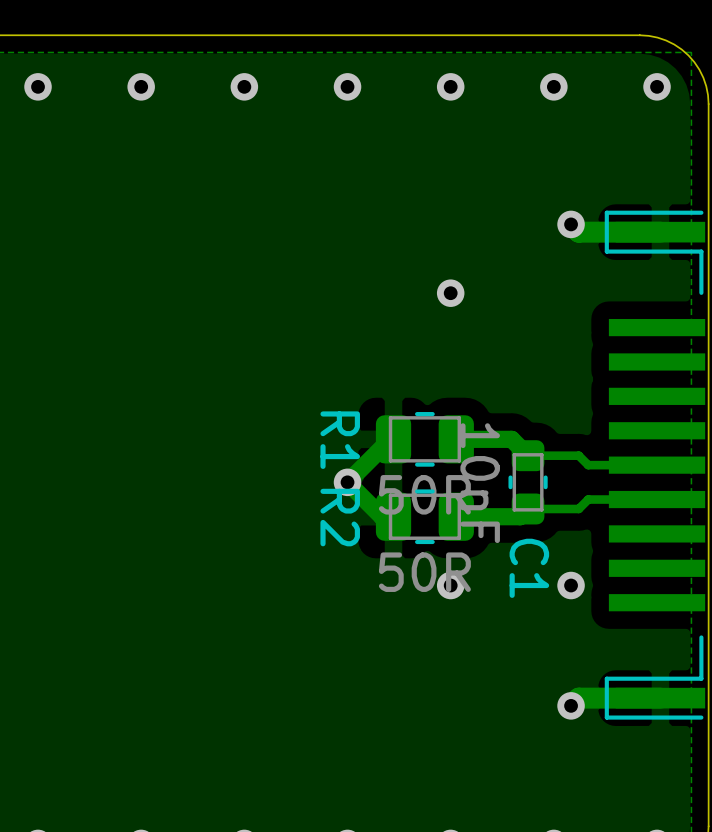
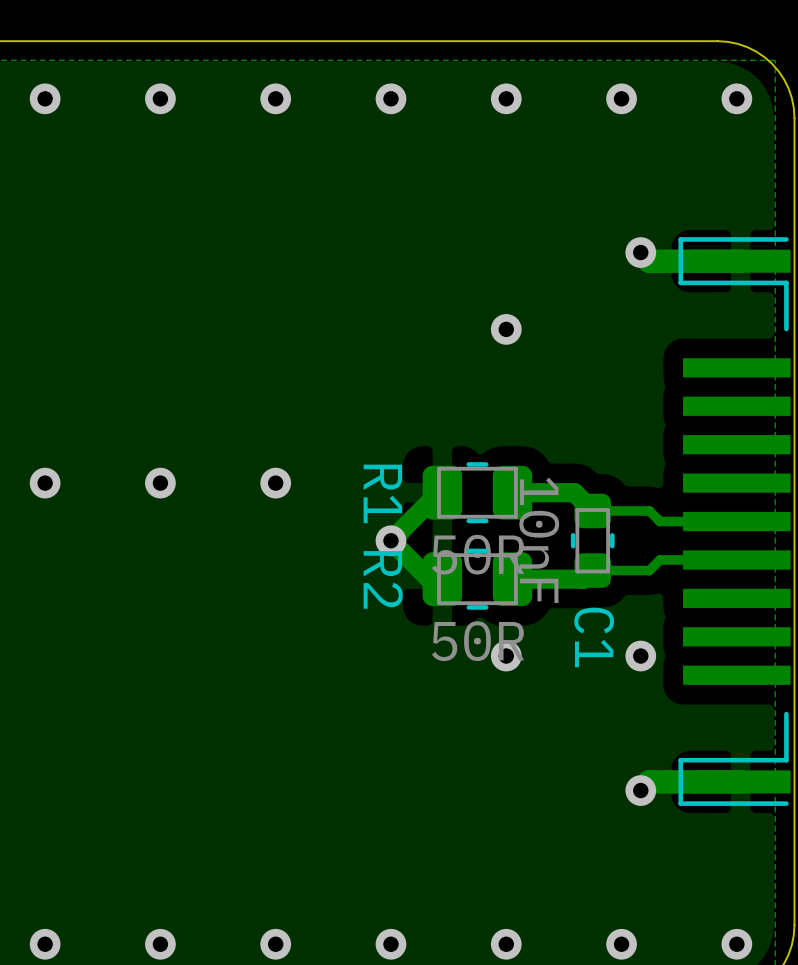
via: none -> (45, 483)
via: none -> (160, 483)
via: none -> (275, 483)

